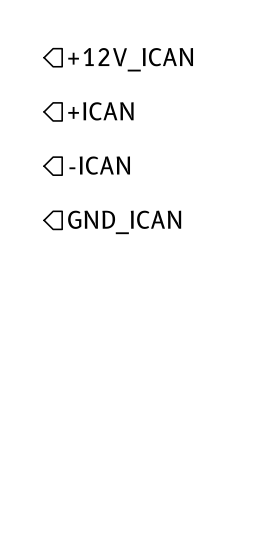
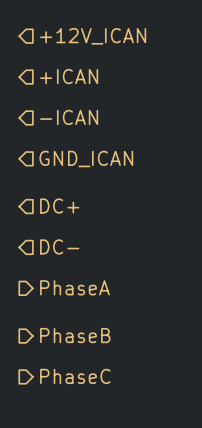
hierarchical label: none -> DC+ (59, 206)
hierarchical label: none -> DC- (59, 246)
hierarchical label: none -> PhaseA (74, 287)
hierarchical label: none -> PhaseB (75, 335)
hierarchical label: none -> PhaseC (75, 376)

